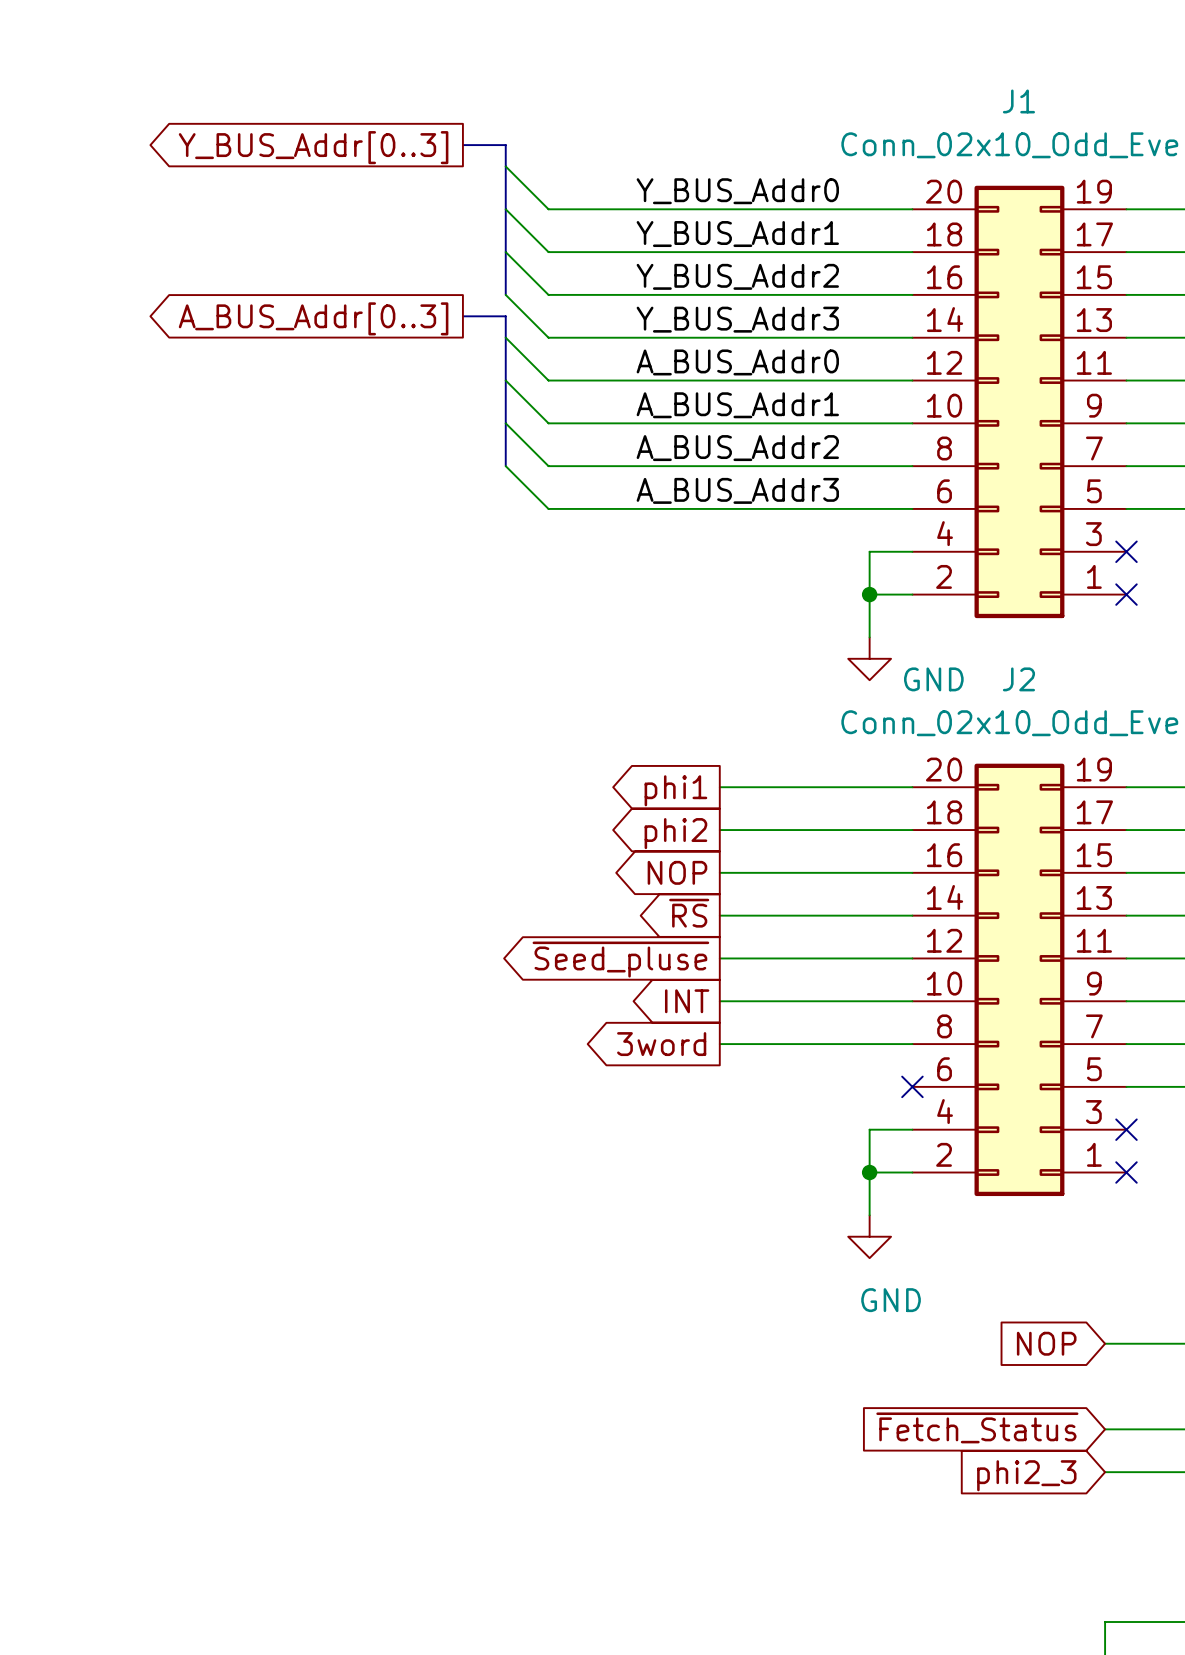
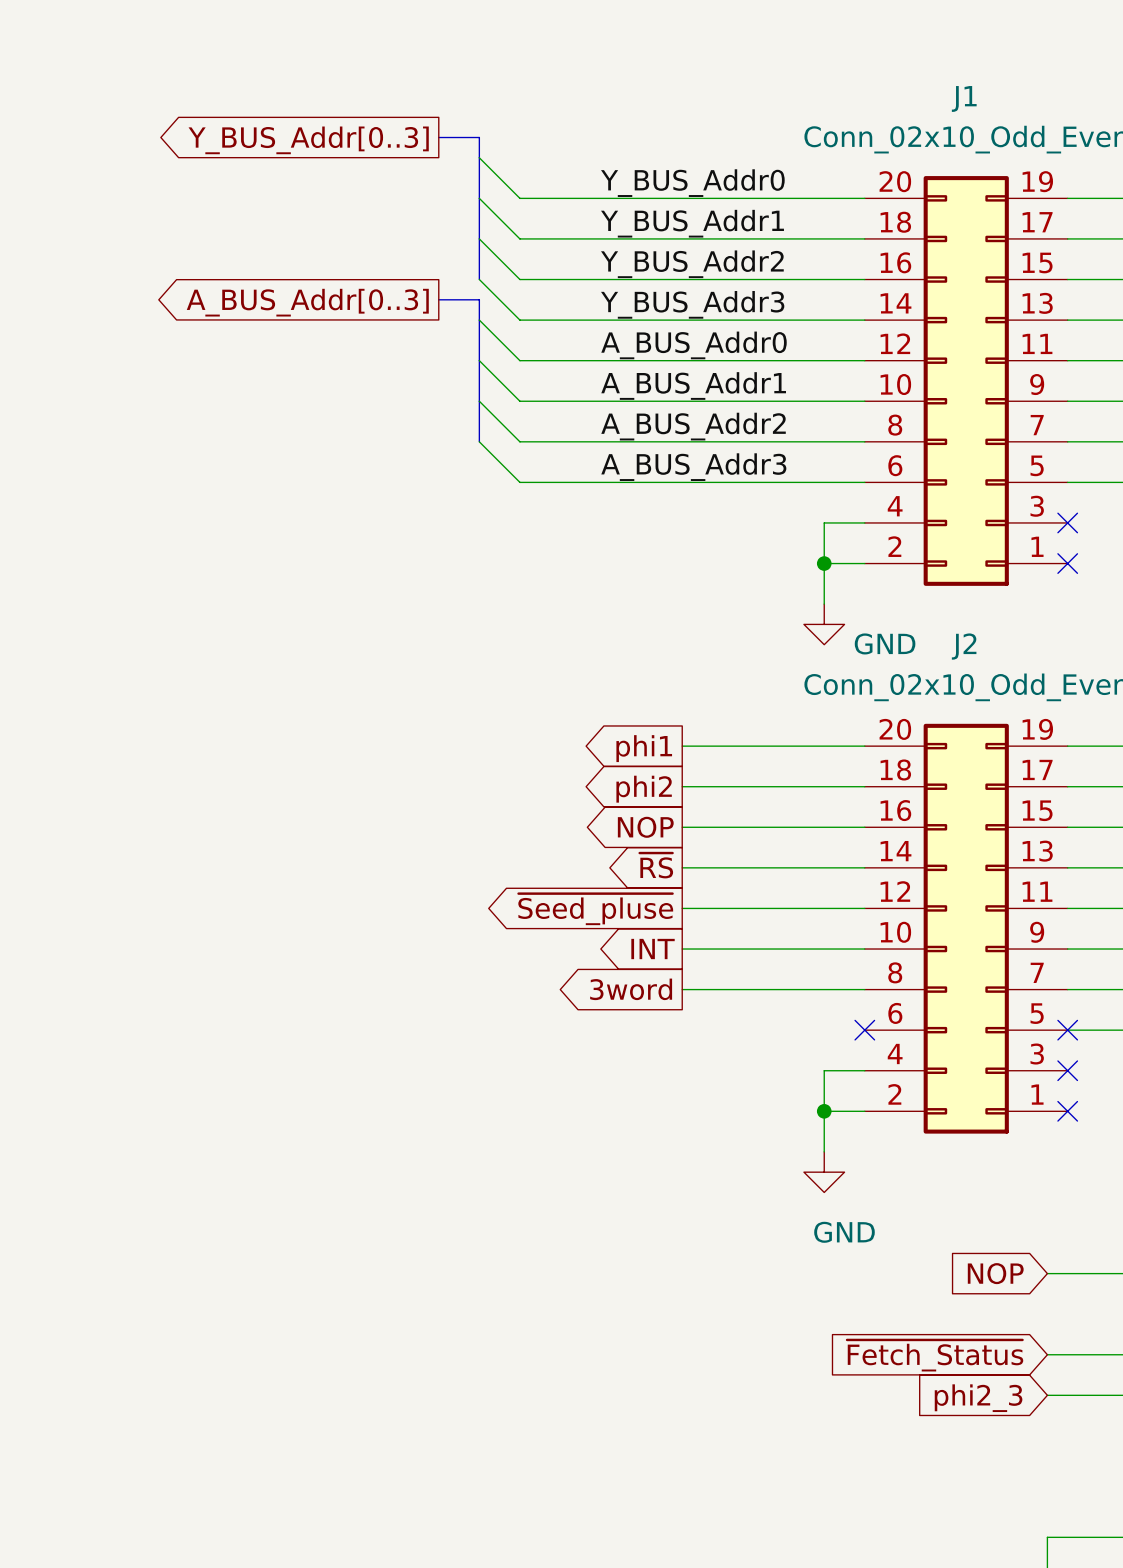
no-connect mark: none -> (1067, 1030)

